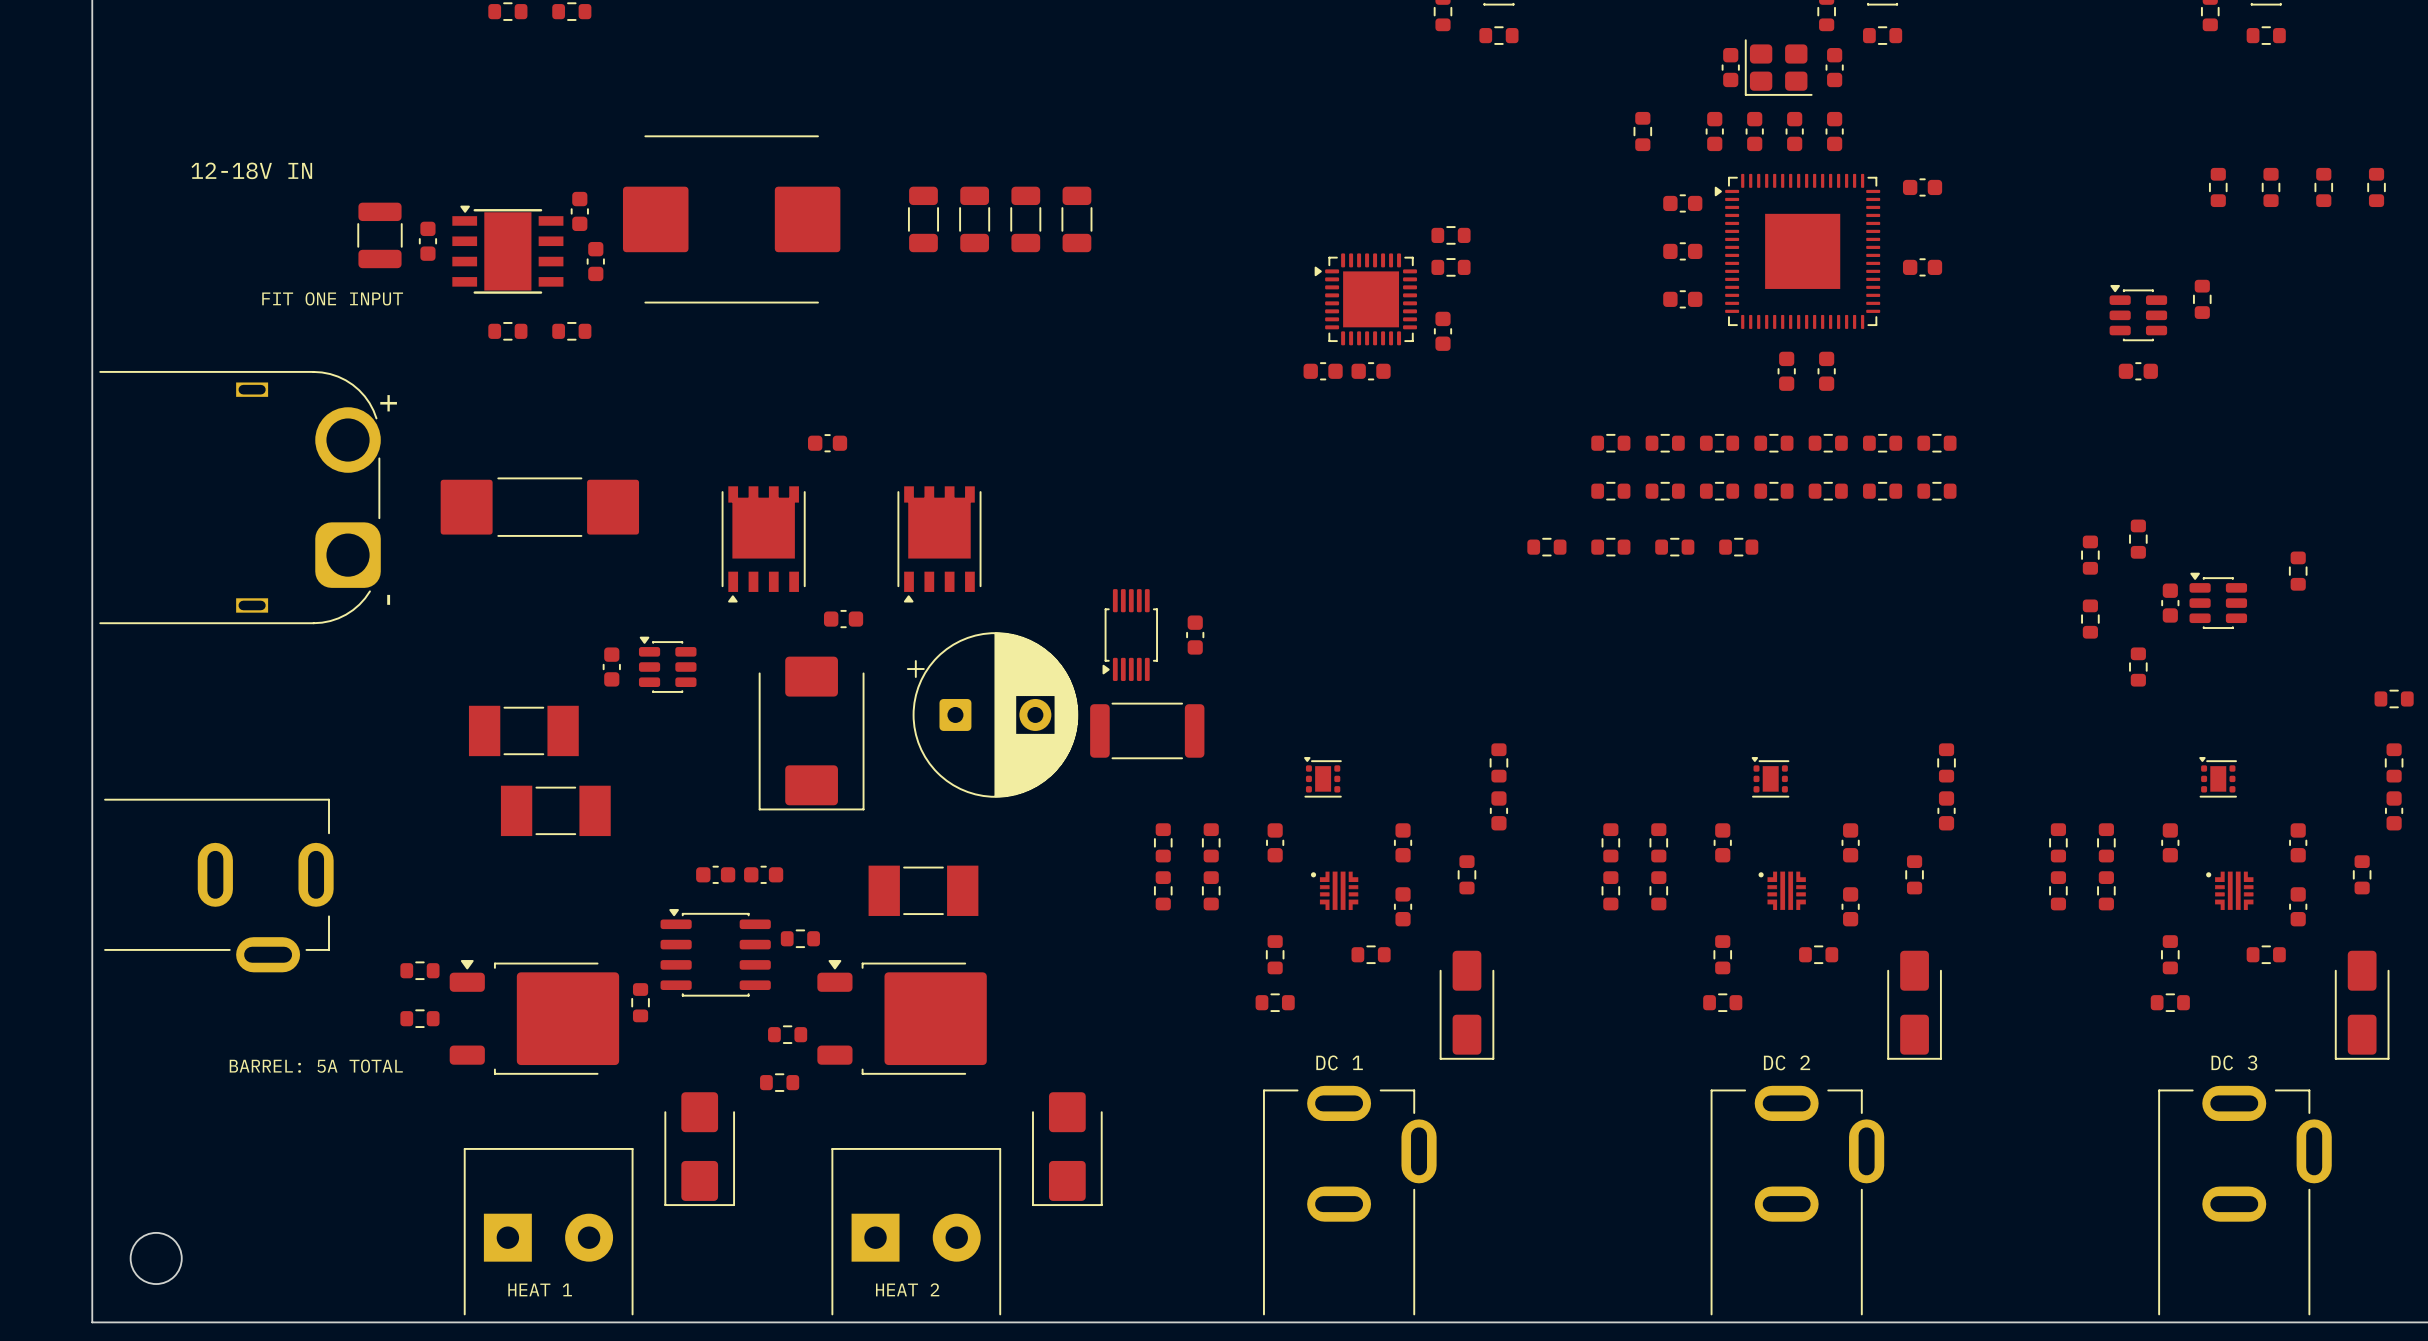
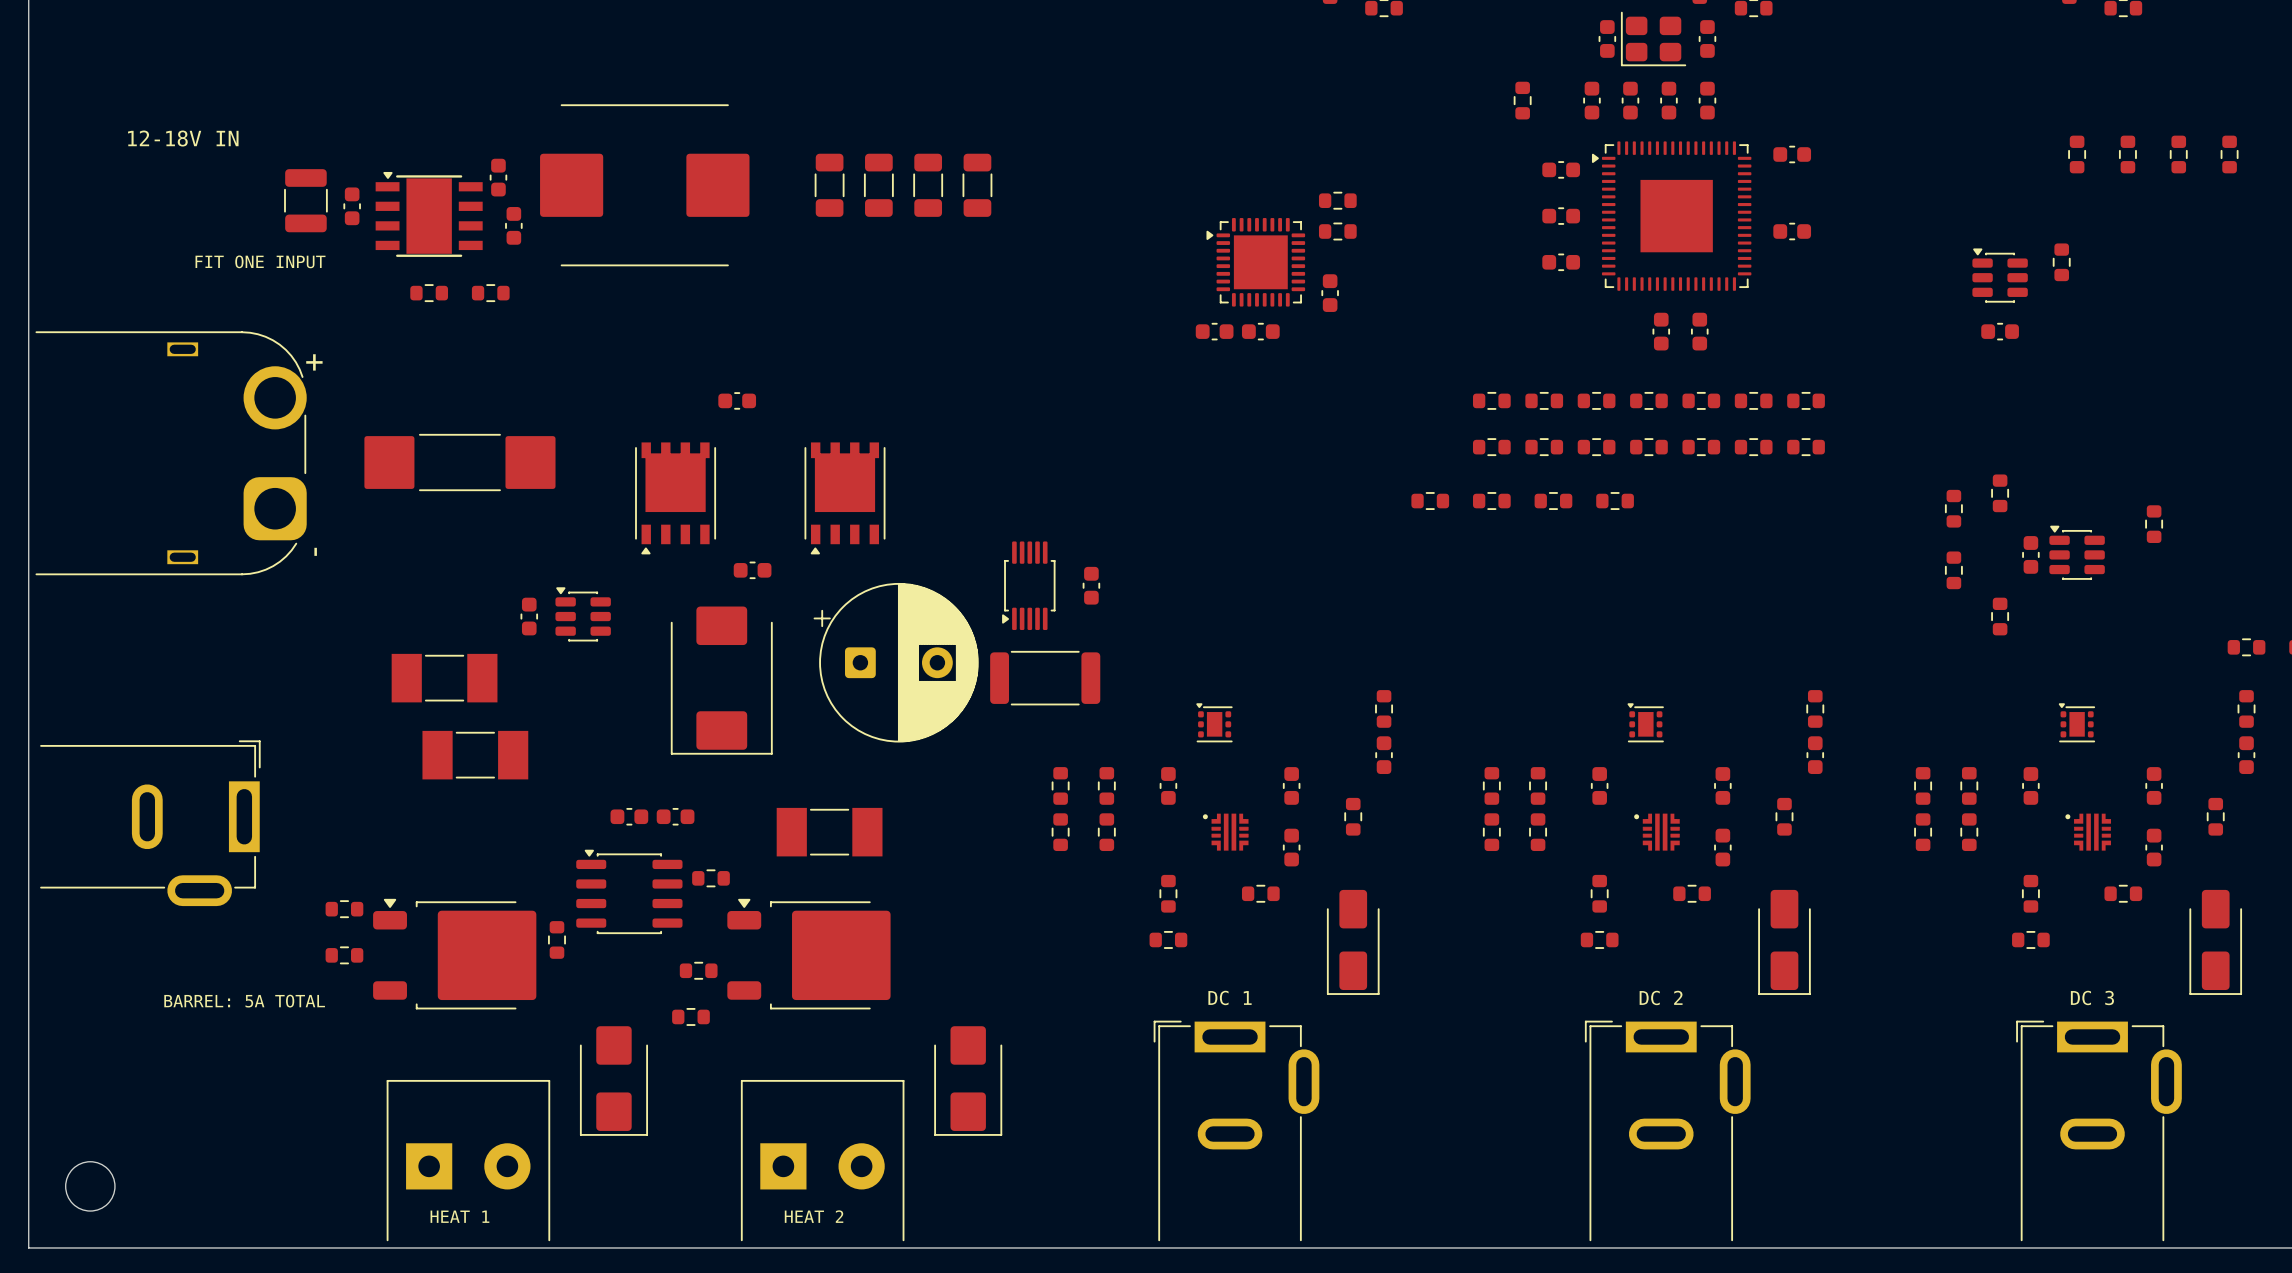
part footprint: [104, 798, 334, 973] -> [40, 740, 261, 907]
part footprint: [1263, 1085, 1437, 1316] -> [1153, 1020, 1320, 1242]
part footprint: [1710, 1085, 1885, 1316] -> [1584, 1020, 1751, 1242]
part footprint: [2158, 1085, 2332, 1316] -> [2016, 1020, 2182, 1242]

